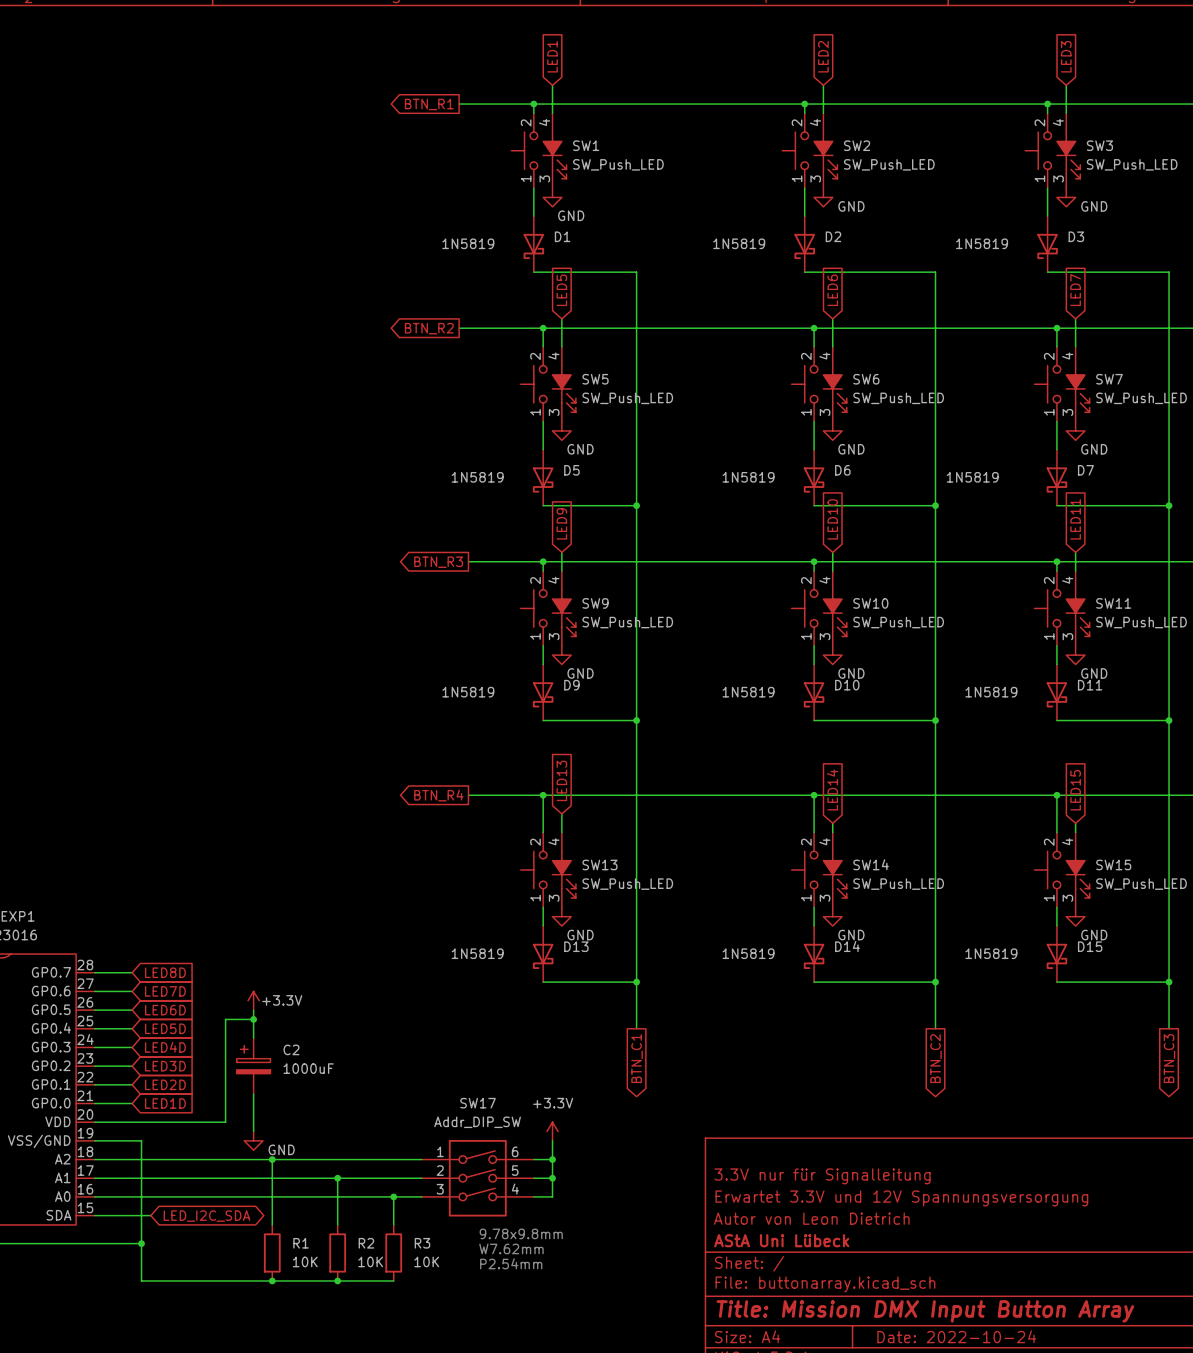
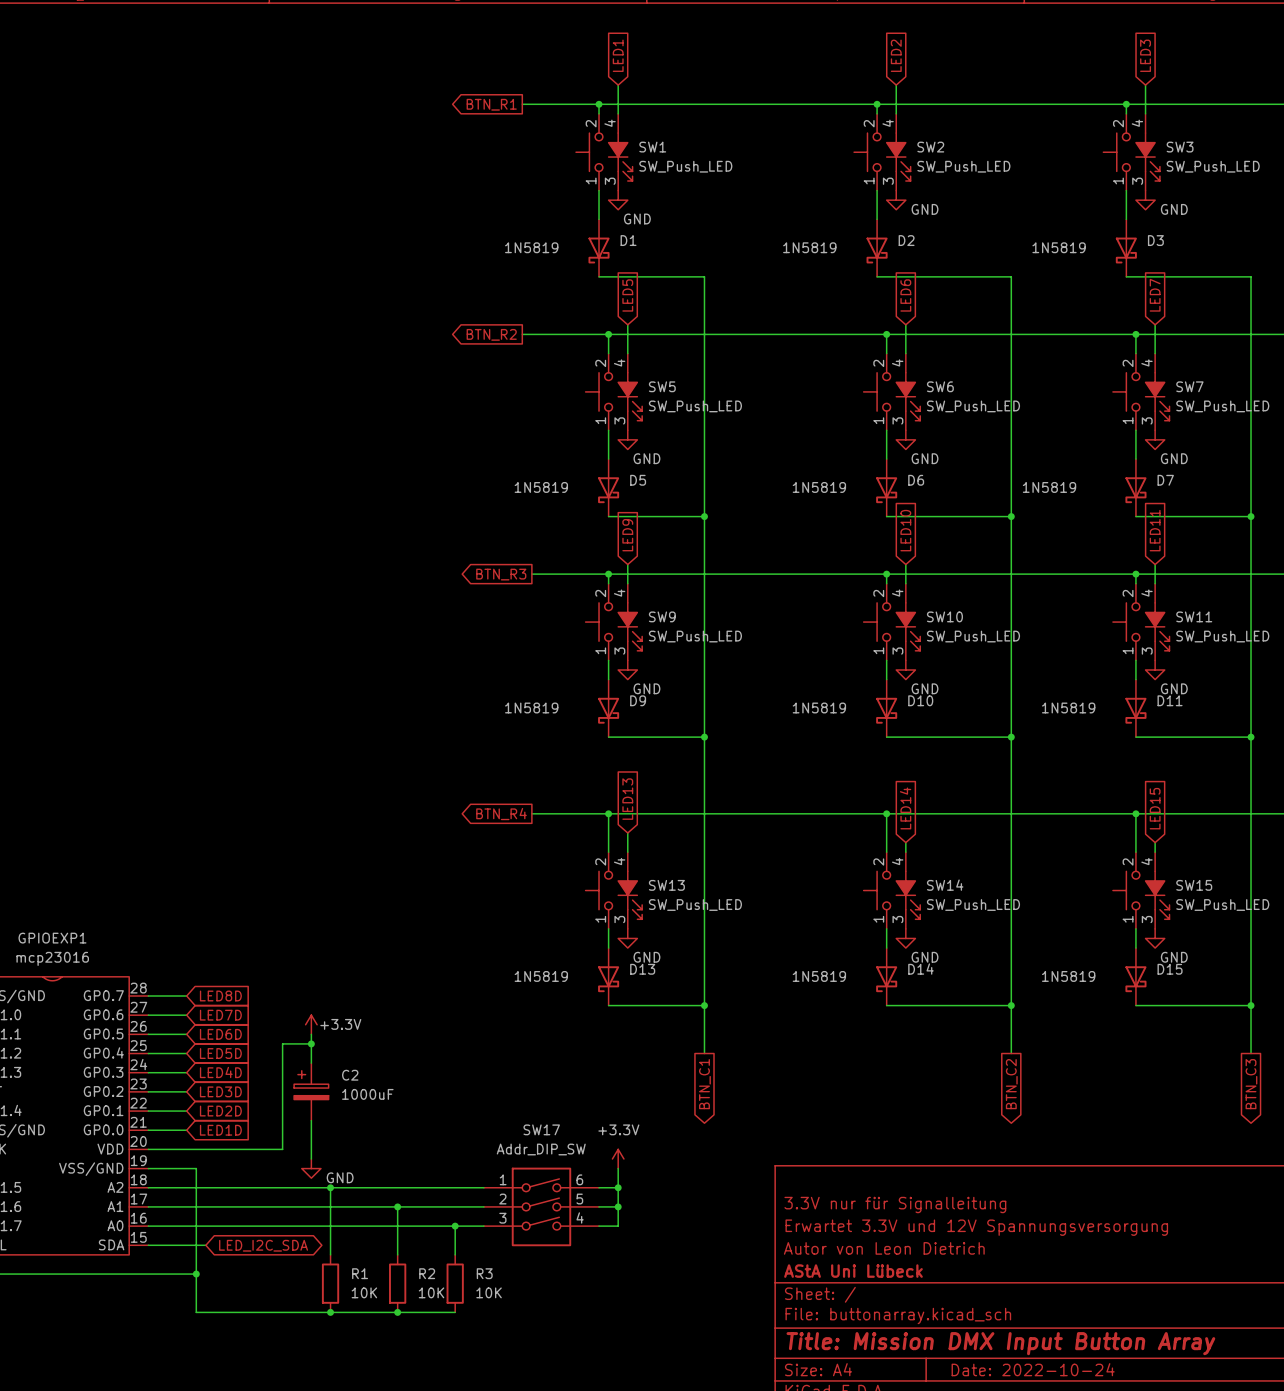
text: 9.78x9.8mm (521, 1233) -> none
text: W7.62mm (511, 1248) -> none
text: P2.54mm (511, 1263) -> none

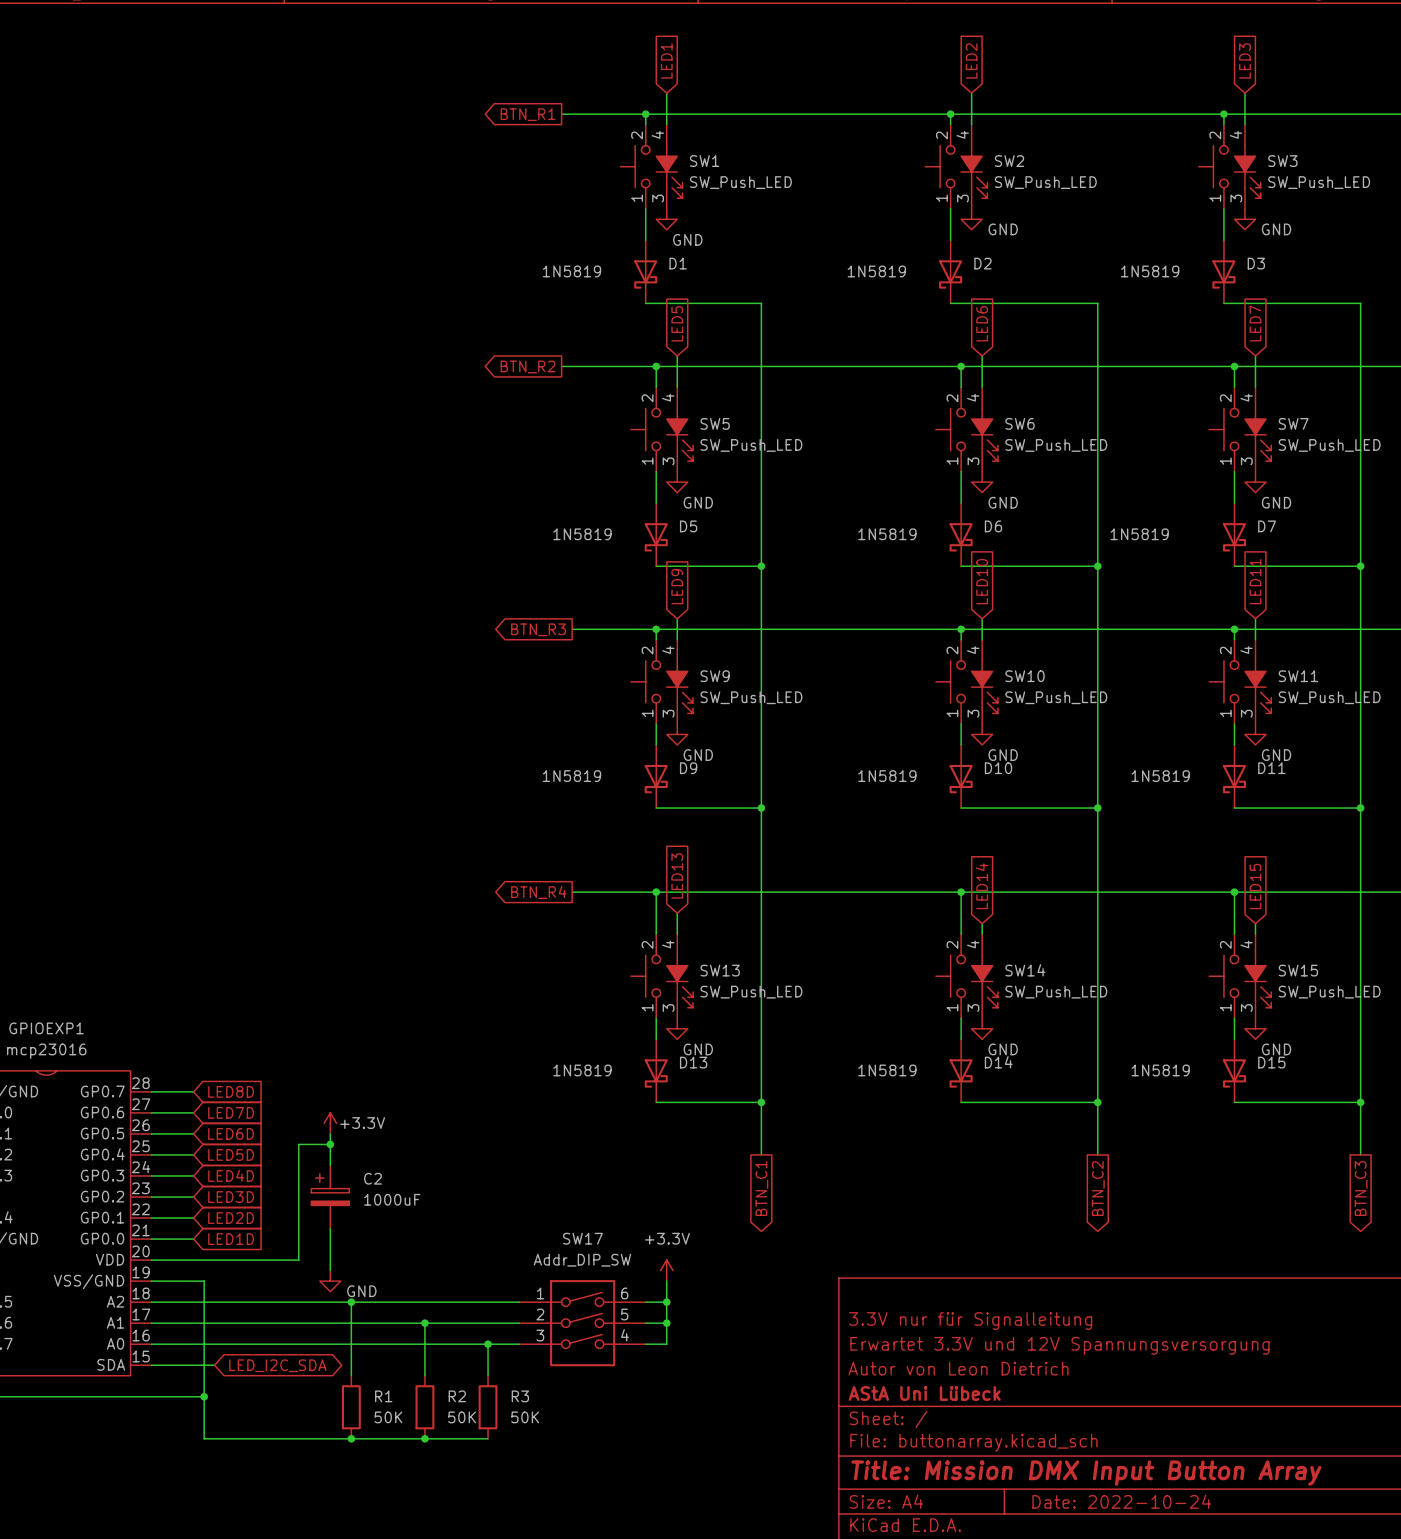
R1 value: 10K (364, 1292) -> 50K (388, 1417)
R2 value: 10K (431, 1292) -> 50K (462, 1417)
R3 value: 10K (489, 1292) -> 50K (525, 1417)

